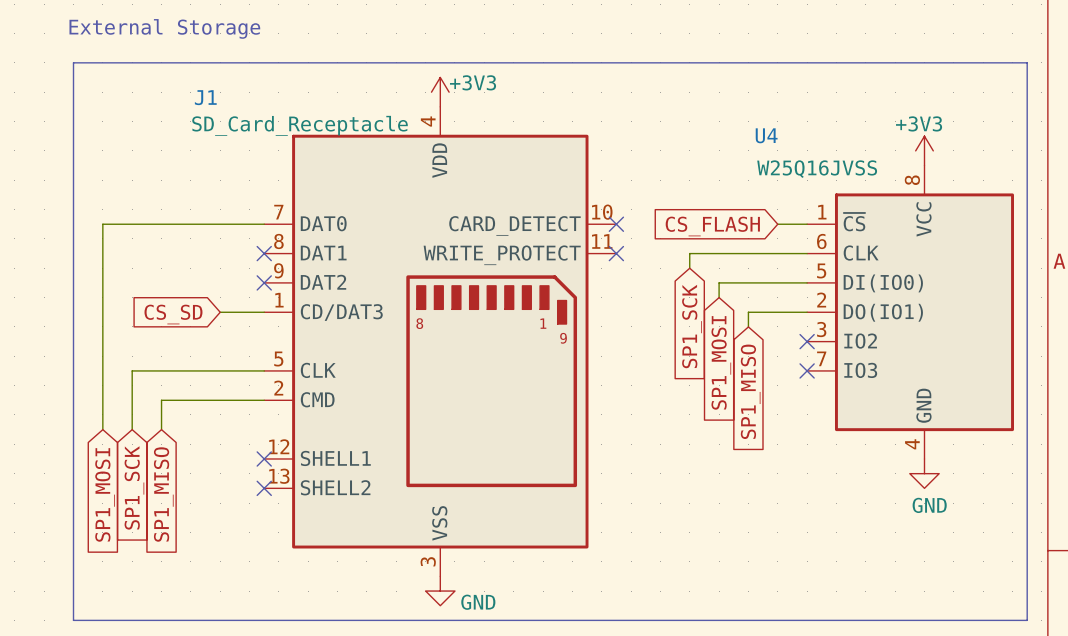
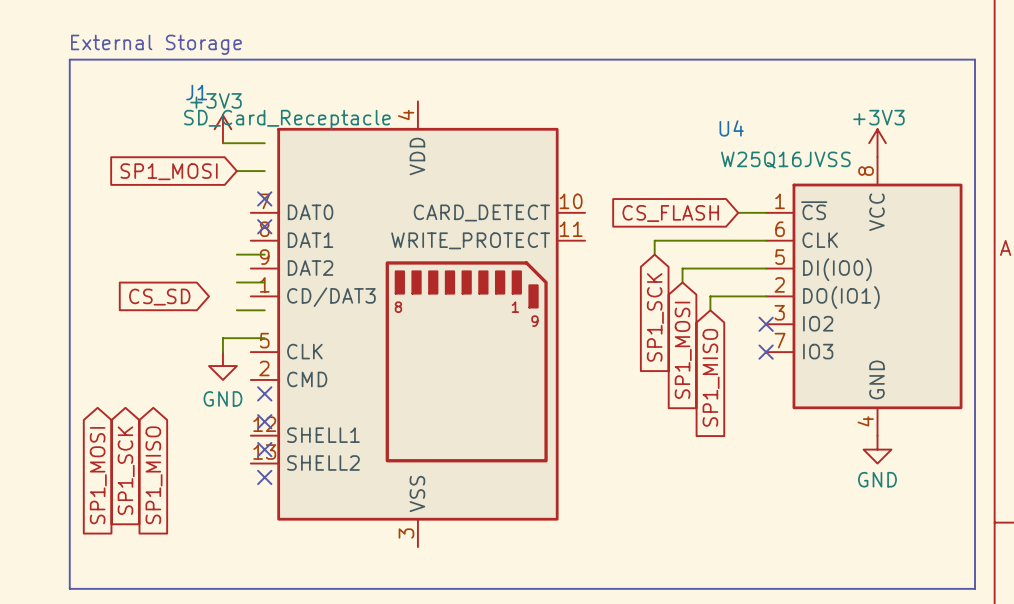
text position: External Storage (164, 28) -> External Storage (156, 44)
power symbol text position: +3V3 (473, 82) -> +3V3 (216, 100)
power symbol position: +3V3 (440, 92) -> +3V3 (222, 129)
wire: none -> (236, 171) (264, 171)
global label: none -> SP1_MOSI (169, 171)
no-connect mark: none -> (264, 198)
wire: (264, 224) (102, 224) (102, 429) -> none
no-connect mark: (616, 224) -> none
no-connect mark position: (264, 253) -> (264, 226)
no-connect mark: (616, 253) -> none
wire: none -> (236, 254) (264, 254)
no-connect mark: (264, 282) -> none
wire: none -> (236, 282) (264, 282)
wire: (220, 312) (264, 312) -> (222, 143) (264, 143)
wire: none -> (236, 310) (264, 310)
wire: none -> (264, 338) (222, 338) (222, 352)
wire: (264, 370) (132, 370) (132, 429) -> none
power symbol: none -> GND (222, 366)
wire: (264, 400) (161, 400) (161, 429) -> none
no-connect mark: none -> (264, 393)
no-connect mark: none -> (264, 421)
no-connect mark: (264, 458) -> none
no-connect mark: none -> (264, 449)
no-connect mark: (264, 488) -> none
no-connect mark: none -> (264, 477)
power symbol: GND (440, 591) -> none

